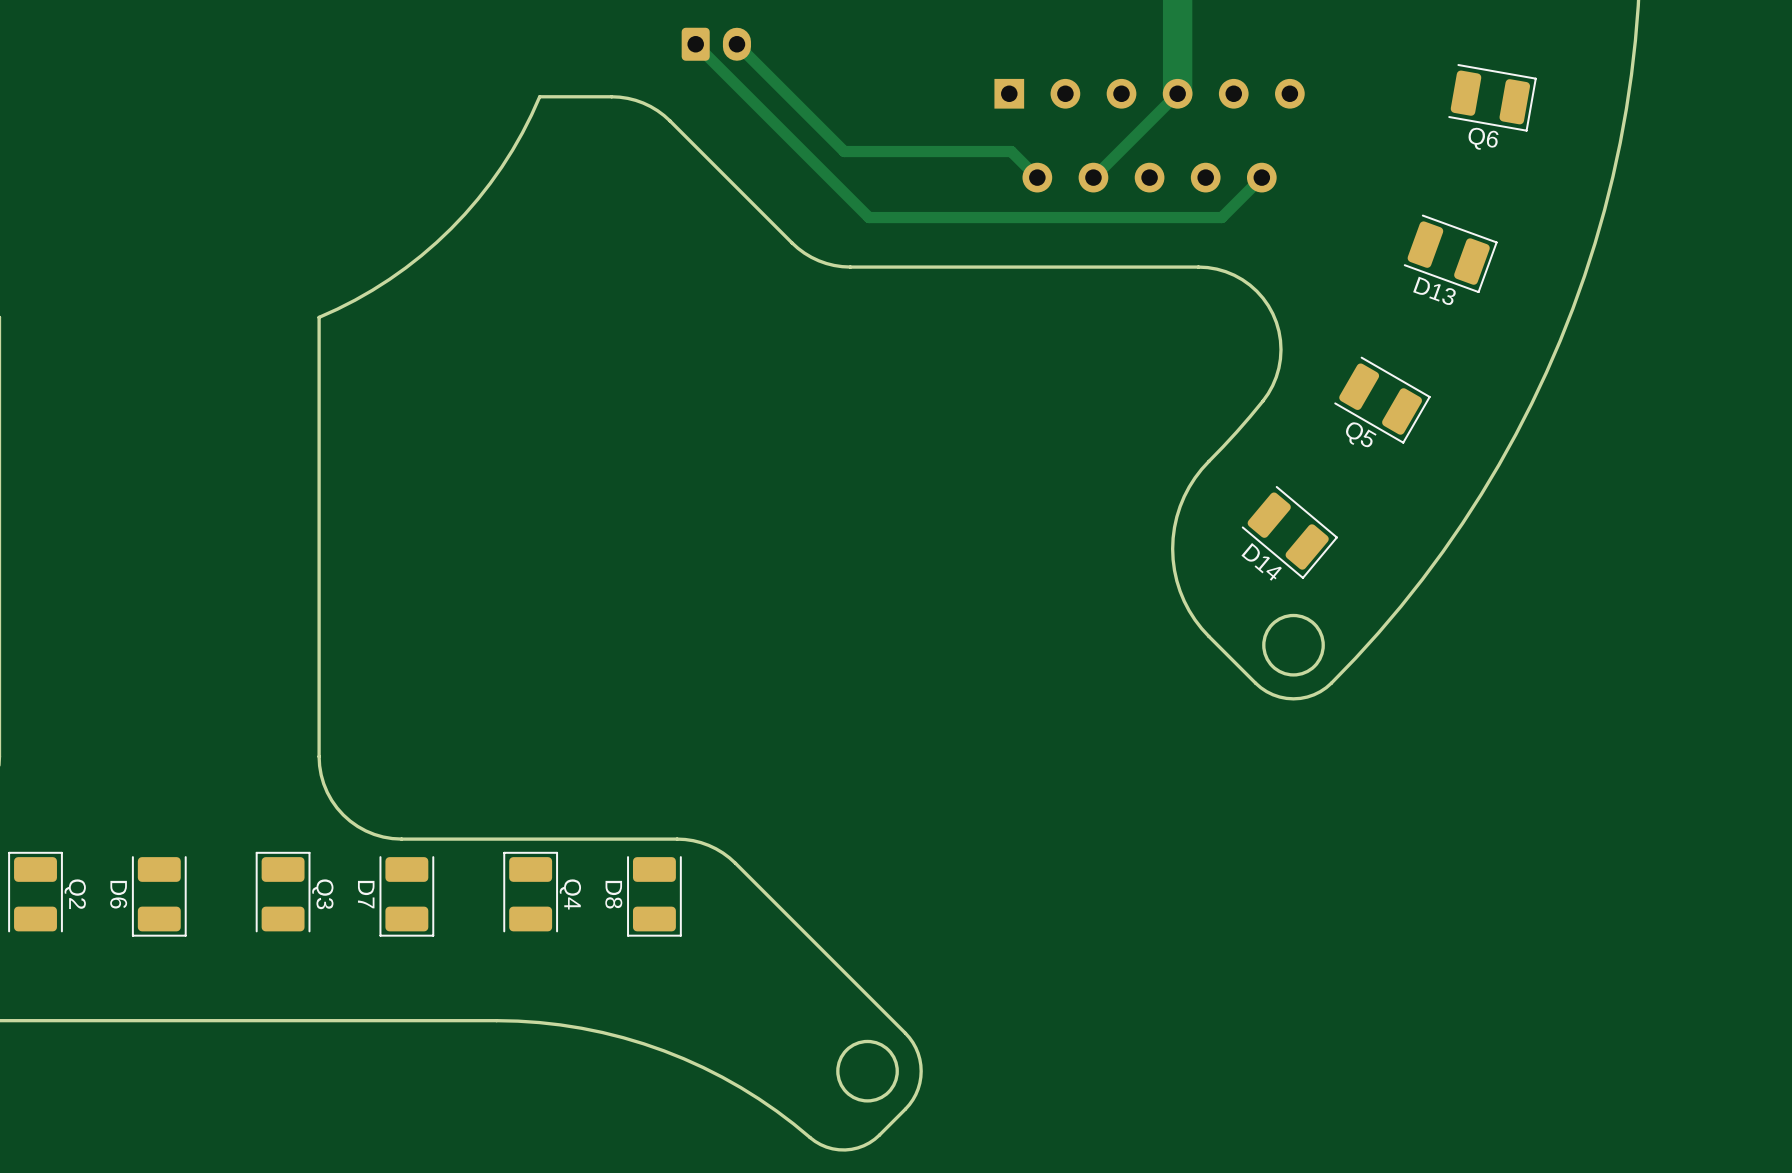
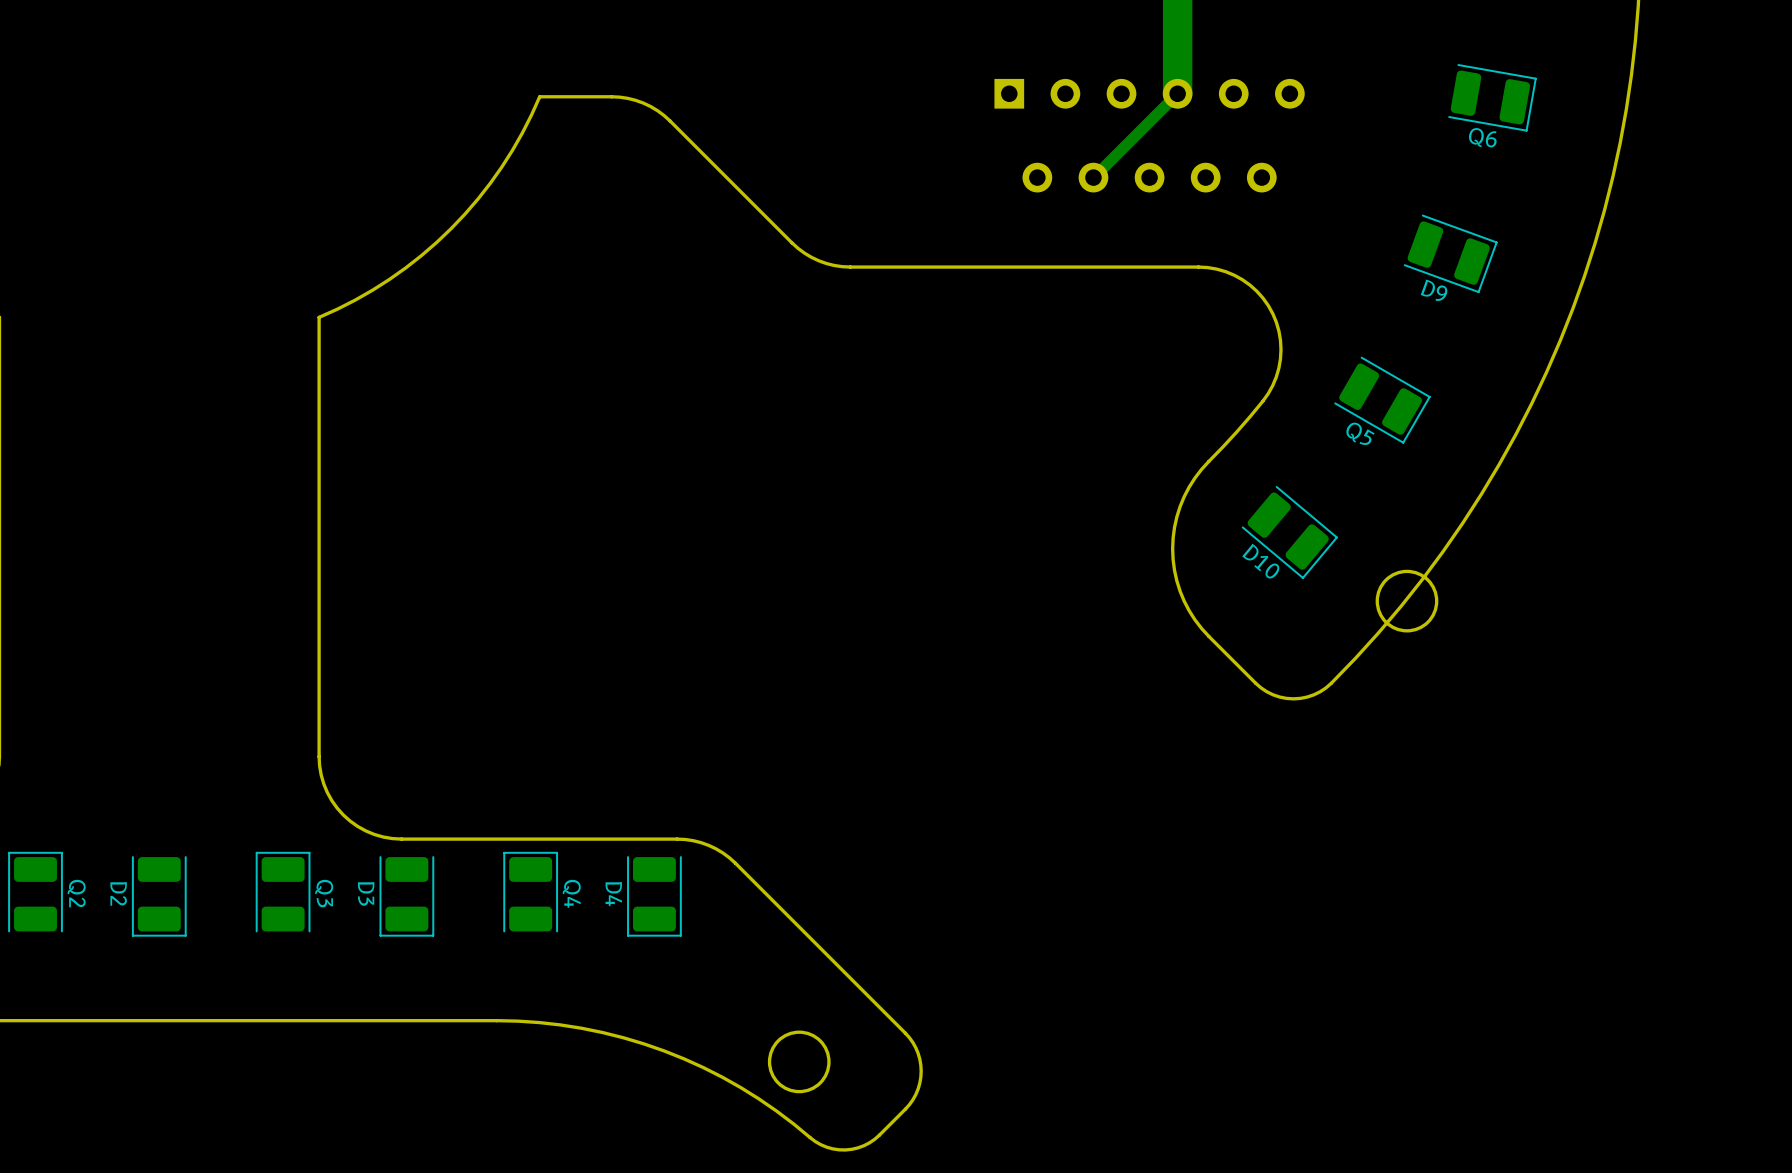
track: (695, 44) (869, 217) (1221, 217) (1261, 177) -> none
part: (716, 44) -> none
track: (736, 44) (844, 151) (1011, 151) (1037, 177) -> none
D13 name: D13 (1434, 291) -> D9 (1434, 290)
D14 name: D14 (1261, 561) -> D10 (1260, 561)
round board edge position: (1293, 645) -> (1406, 601)
D6 name: D6 (118, 894) -> D2 (118, 893)
D7 name: D7 (366, 894) -> D3 (366, 893)
D8 name: D8 (613, 894) -> D4 (613, 894)
round board edge position: (867, 1071) -> (799, 1061)

